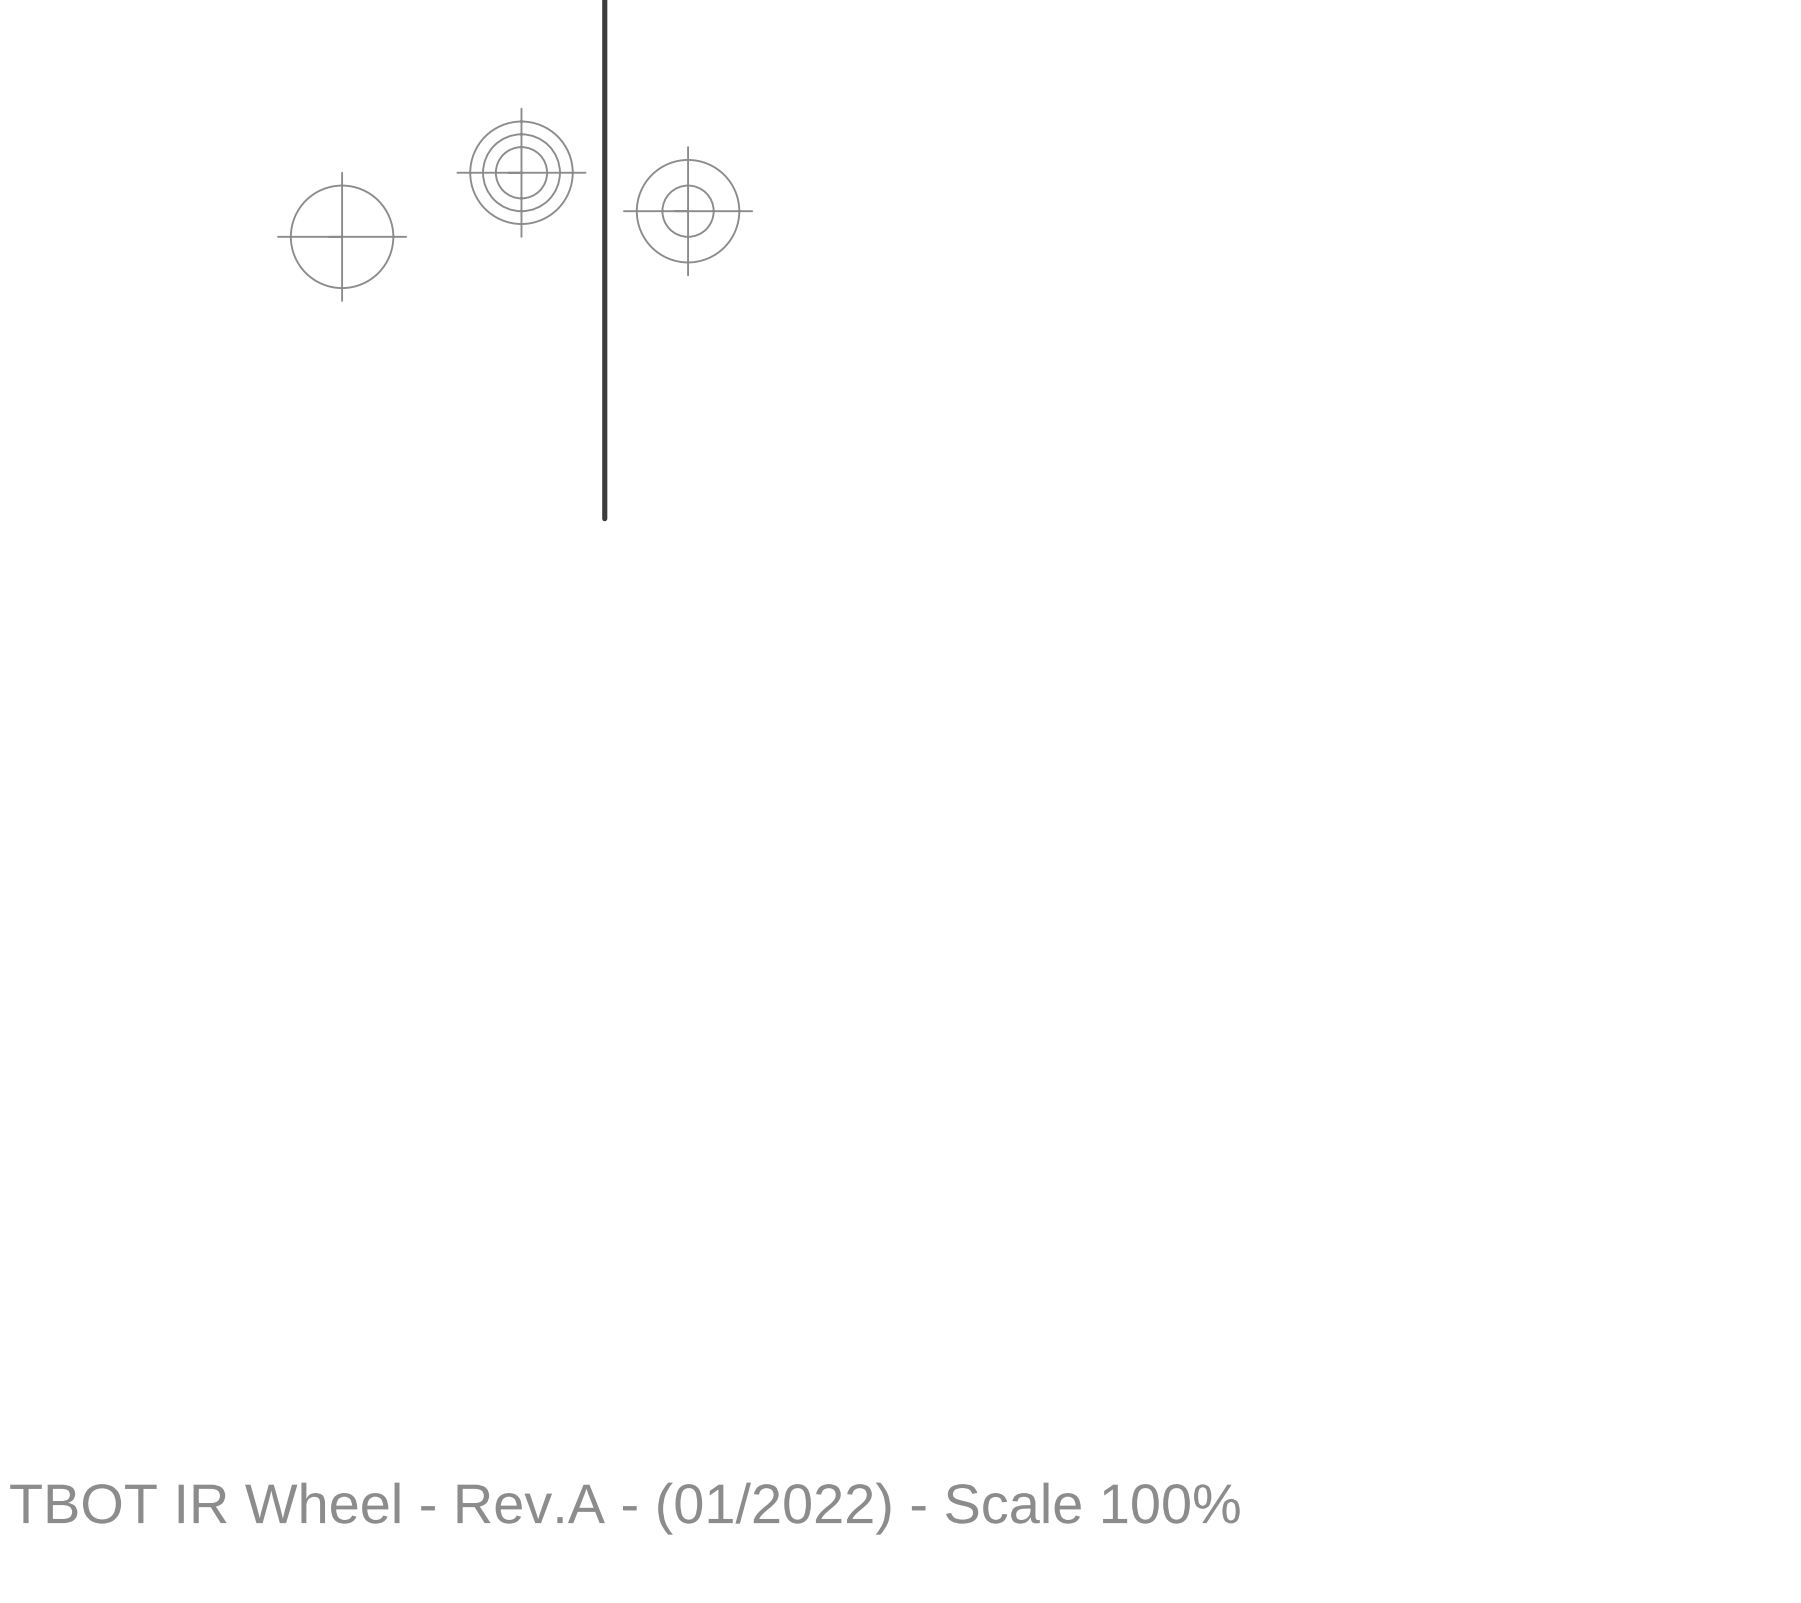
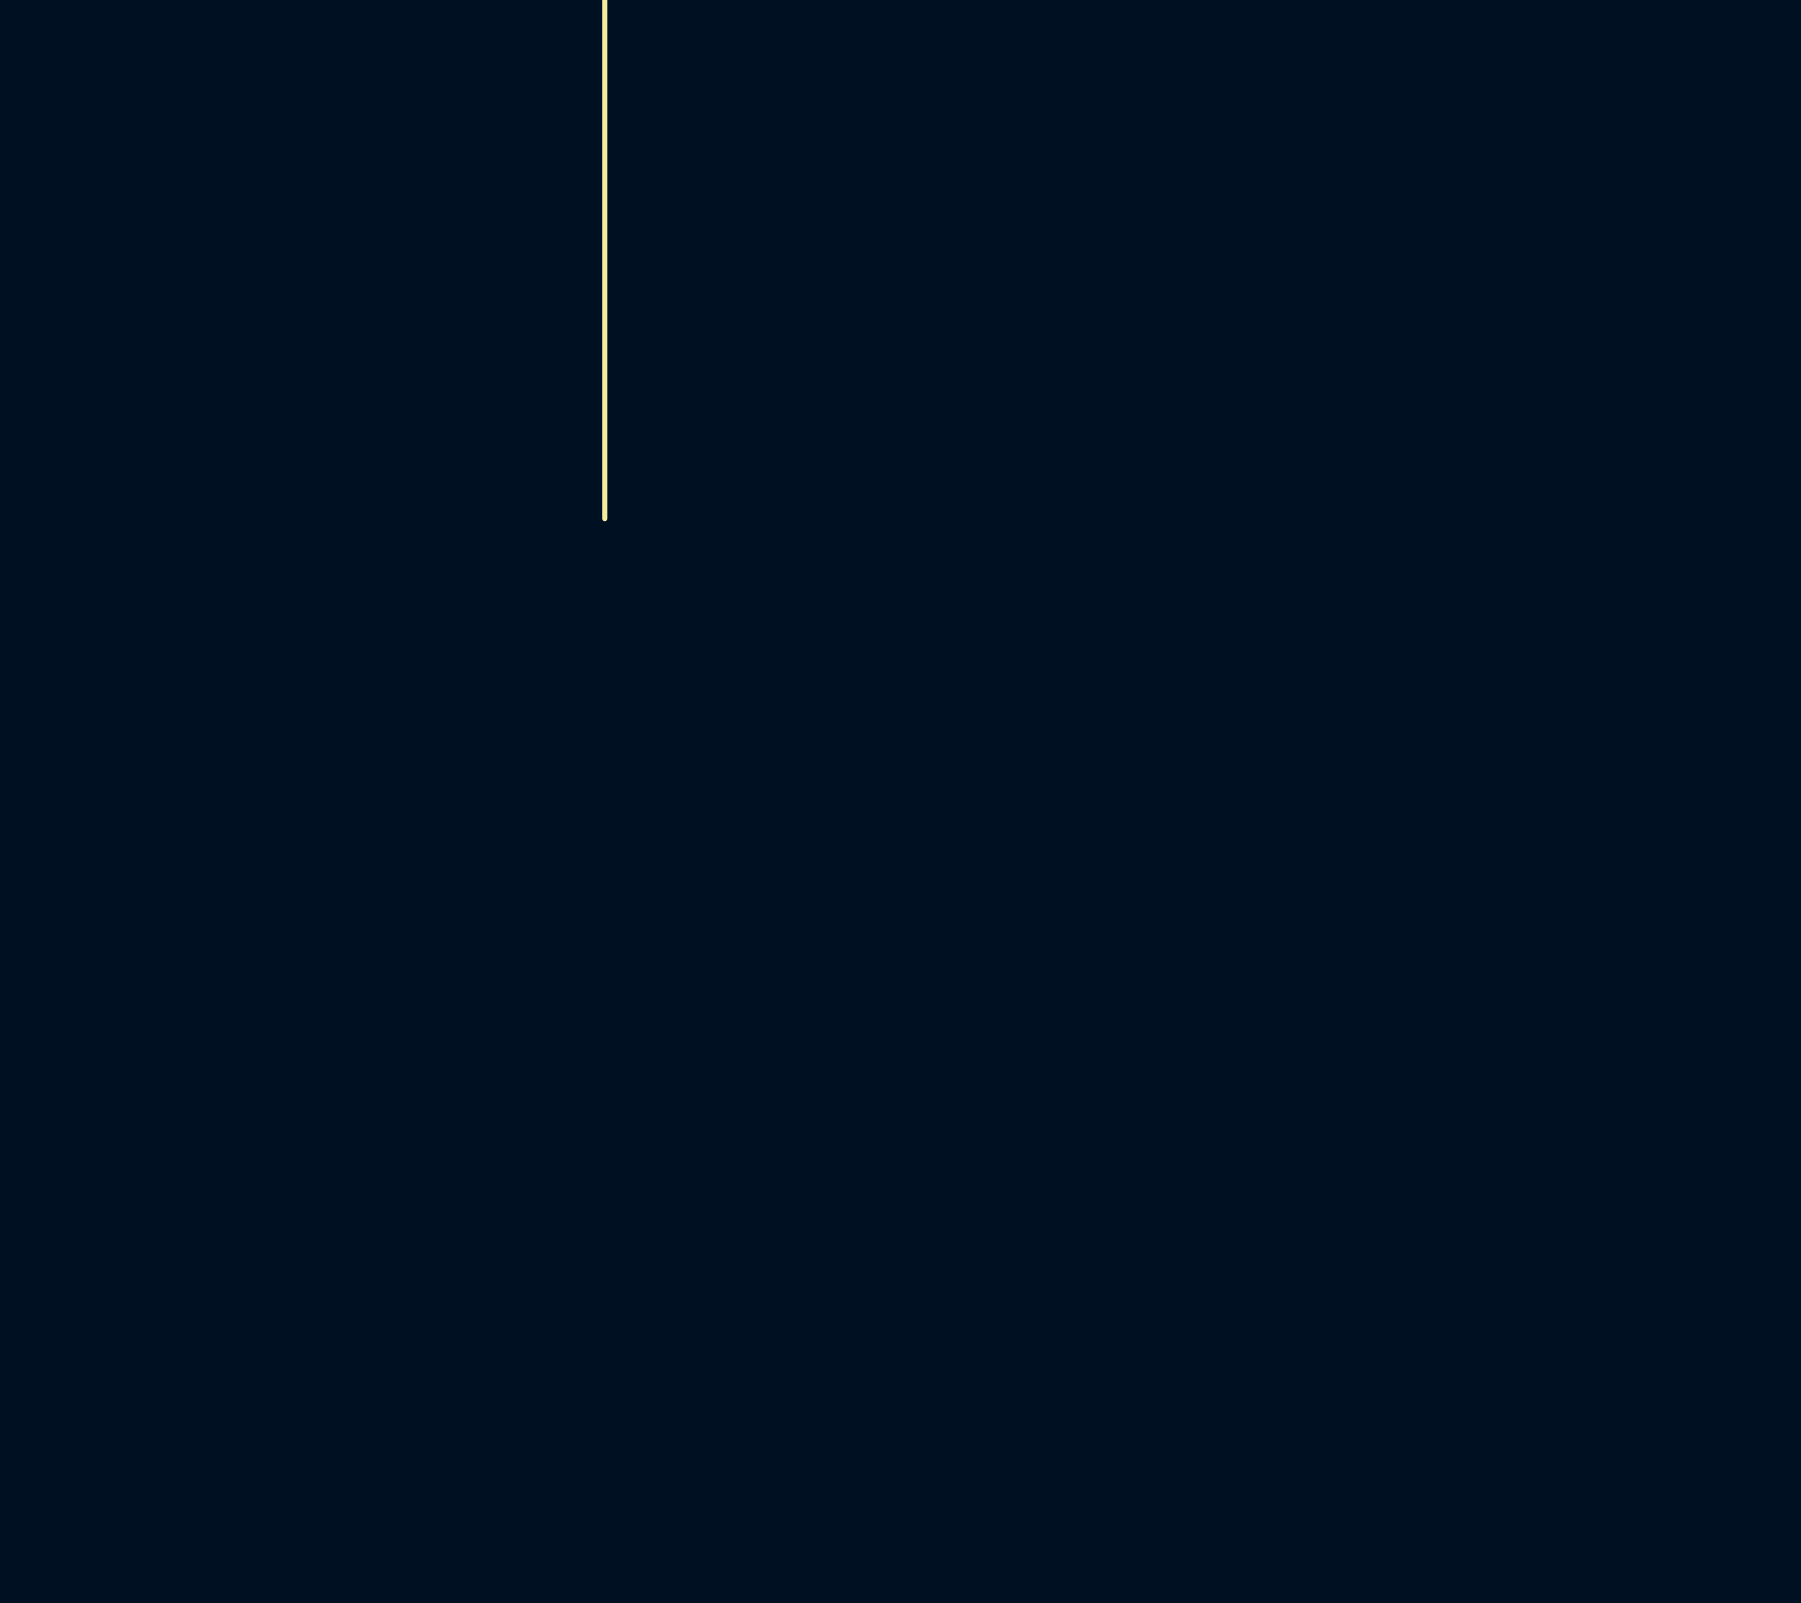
line: (521, 108) (521, 236) -> none
drawing: [469, 120, 574, 225] -> none
line: (688, 147) (688, 275) -> none
drawing: [636, 159, 740, 264] -> none
line: (342, 172) (342, 300) -> none
line: (457, 172) (585, 172) -> none
drawing: [290, 184, 394, 289] -> none
line: (623, 211) (752, 211) -> none
line: (278, 236) (406, 236) -> none
text: TBOT IR Wheel - Rev.A - (01/2022) - Scale 100% (624, 1508) -> none

